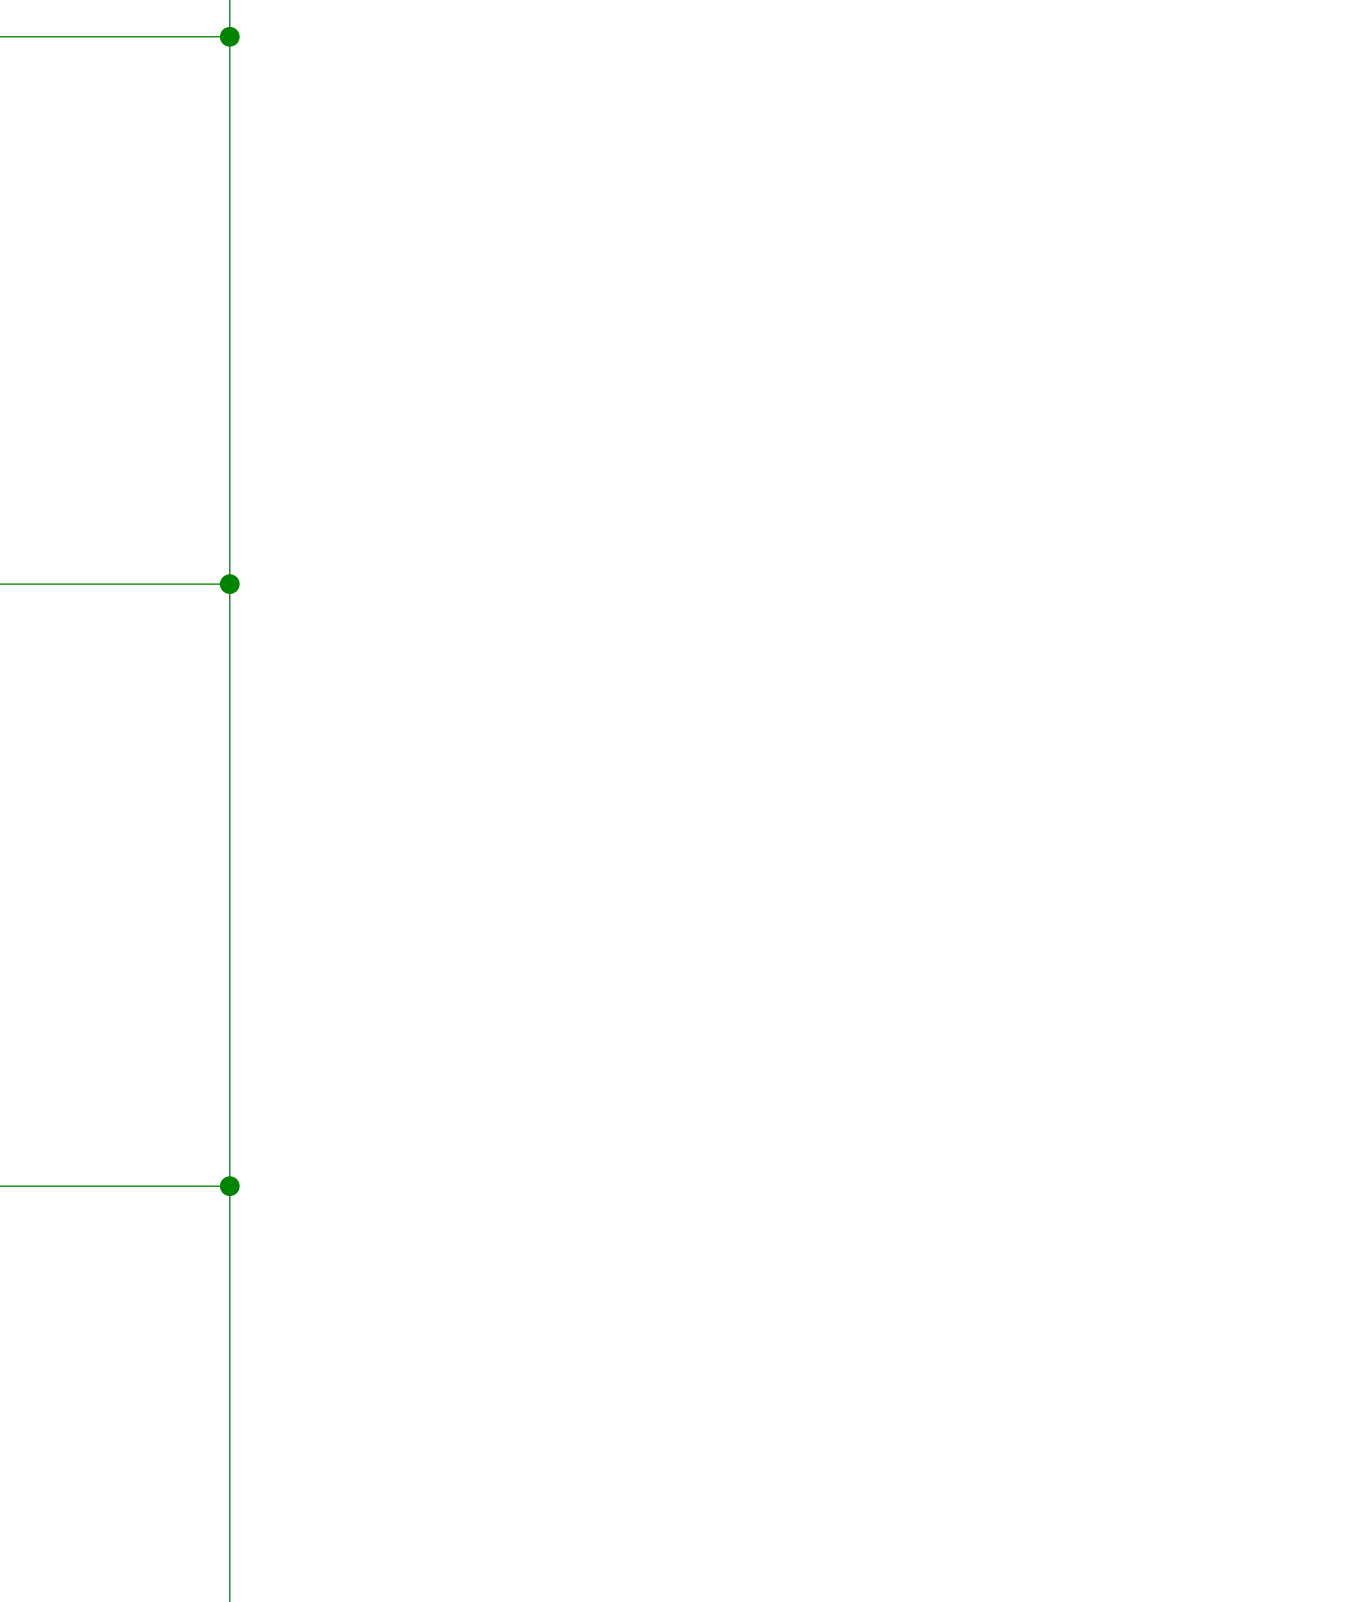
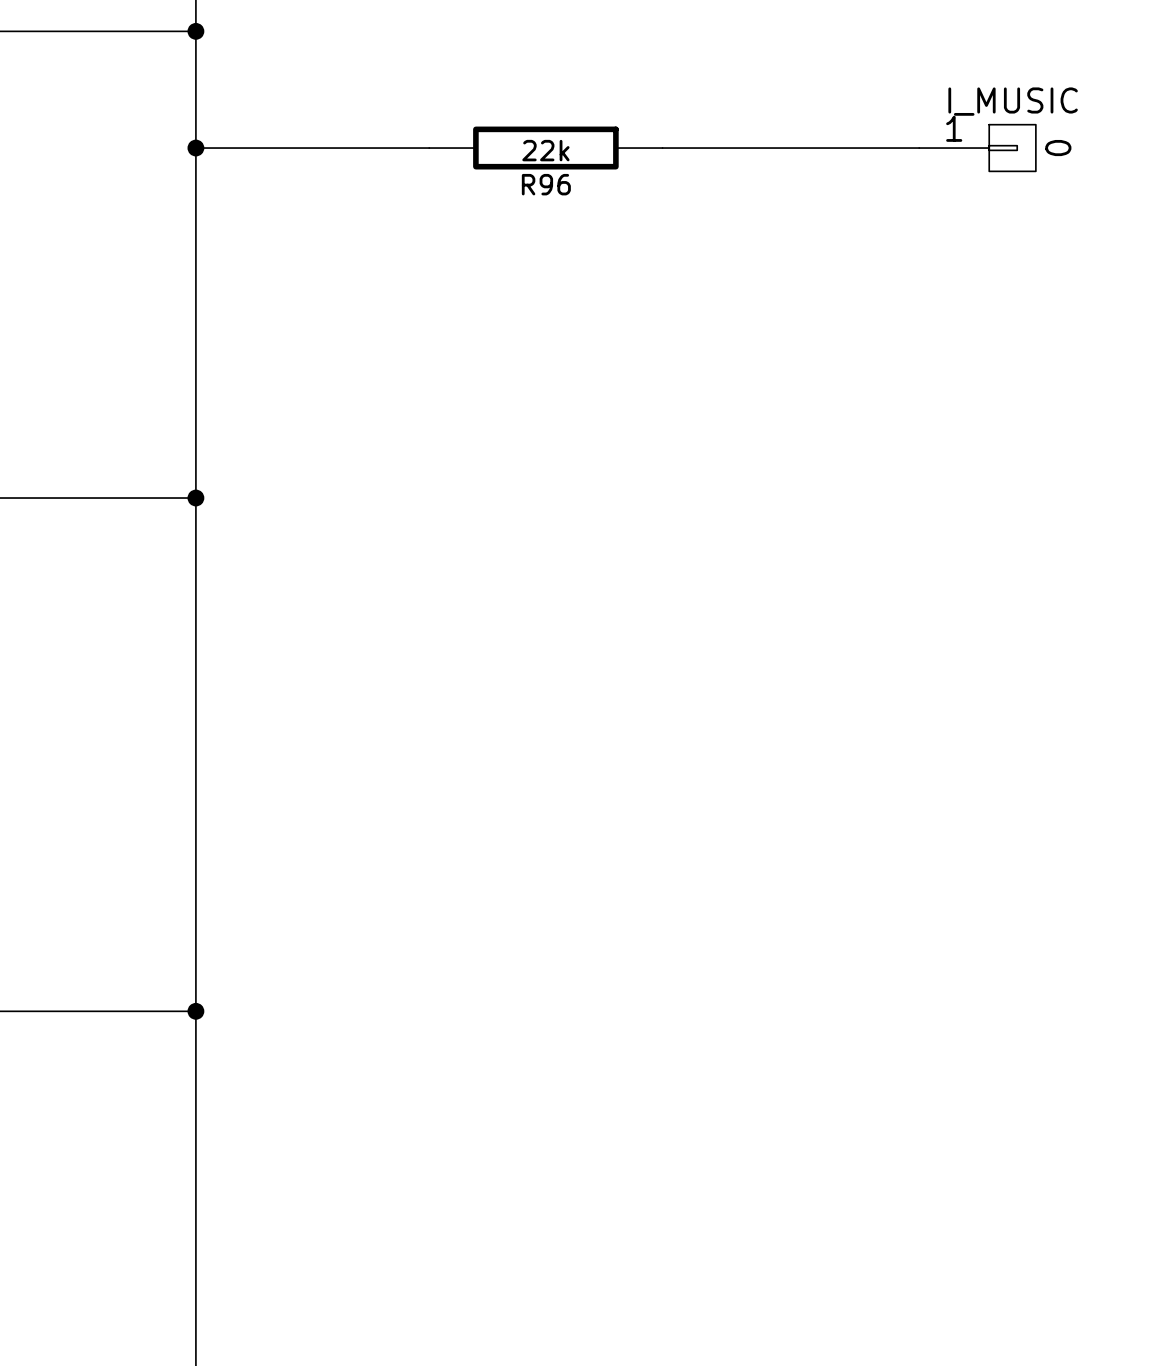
wire: none -> (195, 148) (429, 148)
junction: none -> (195, 148)
R96: none -> 22k (545, 148)
wire: none -> (662, 148) (919, 148)
I_MUSIC: none -> 0 (977, 148)

